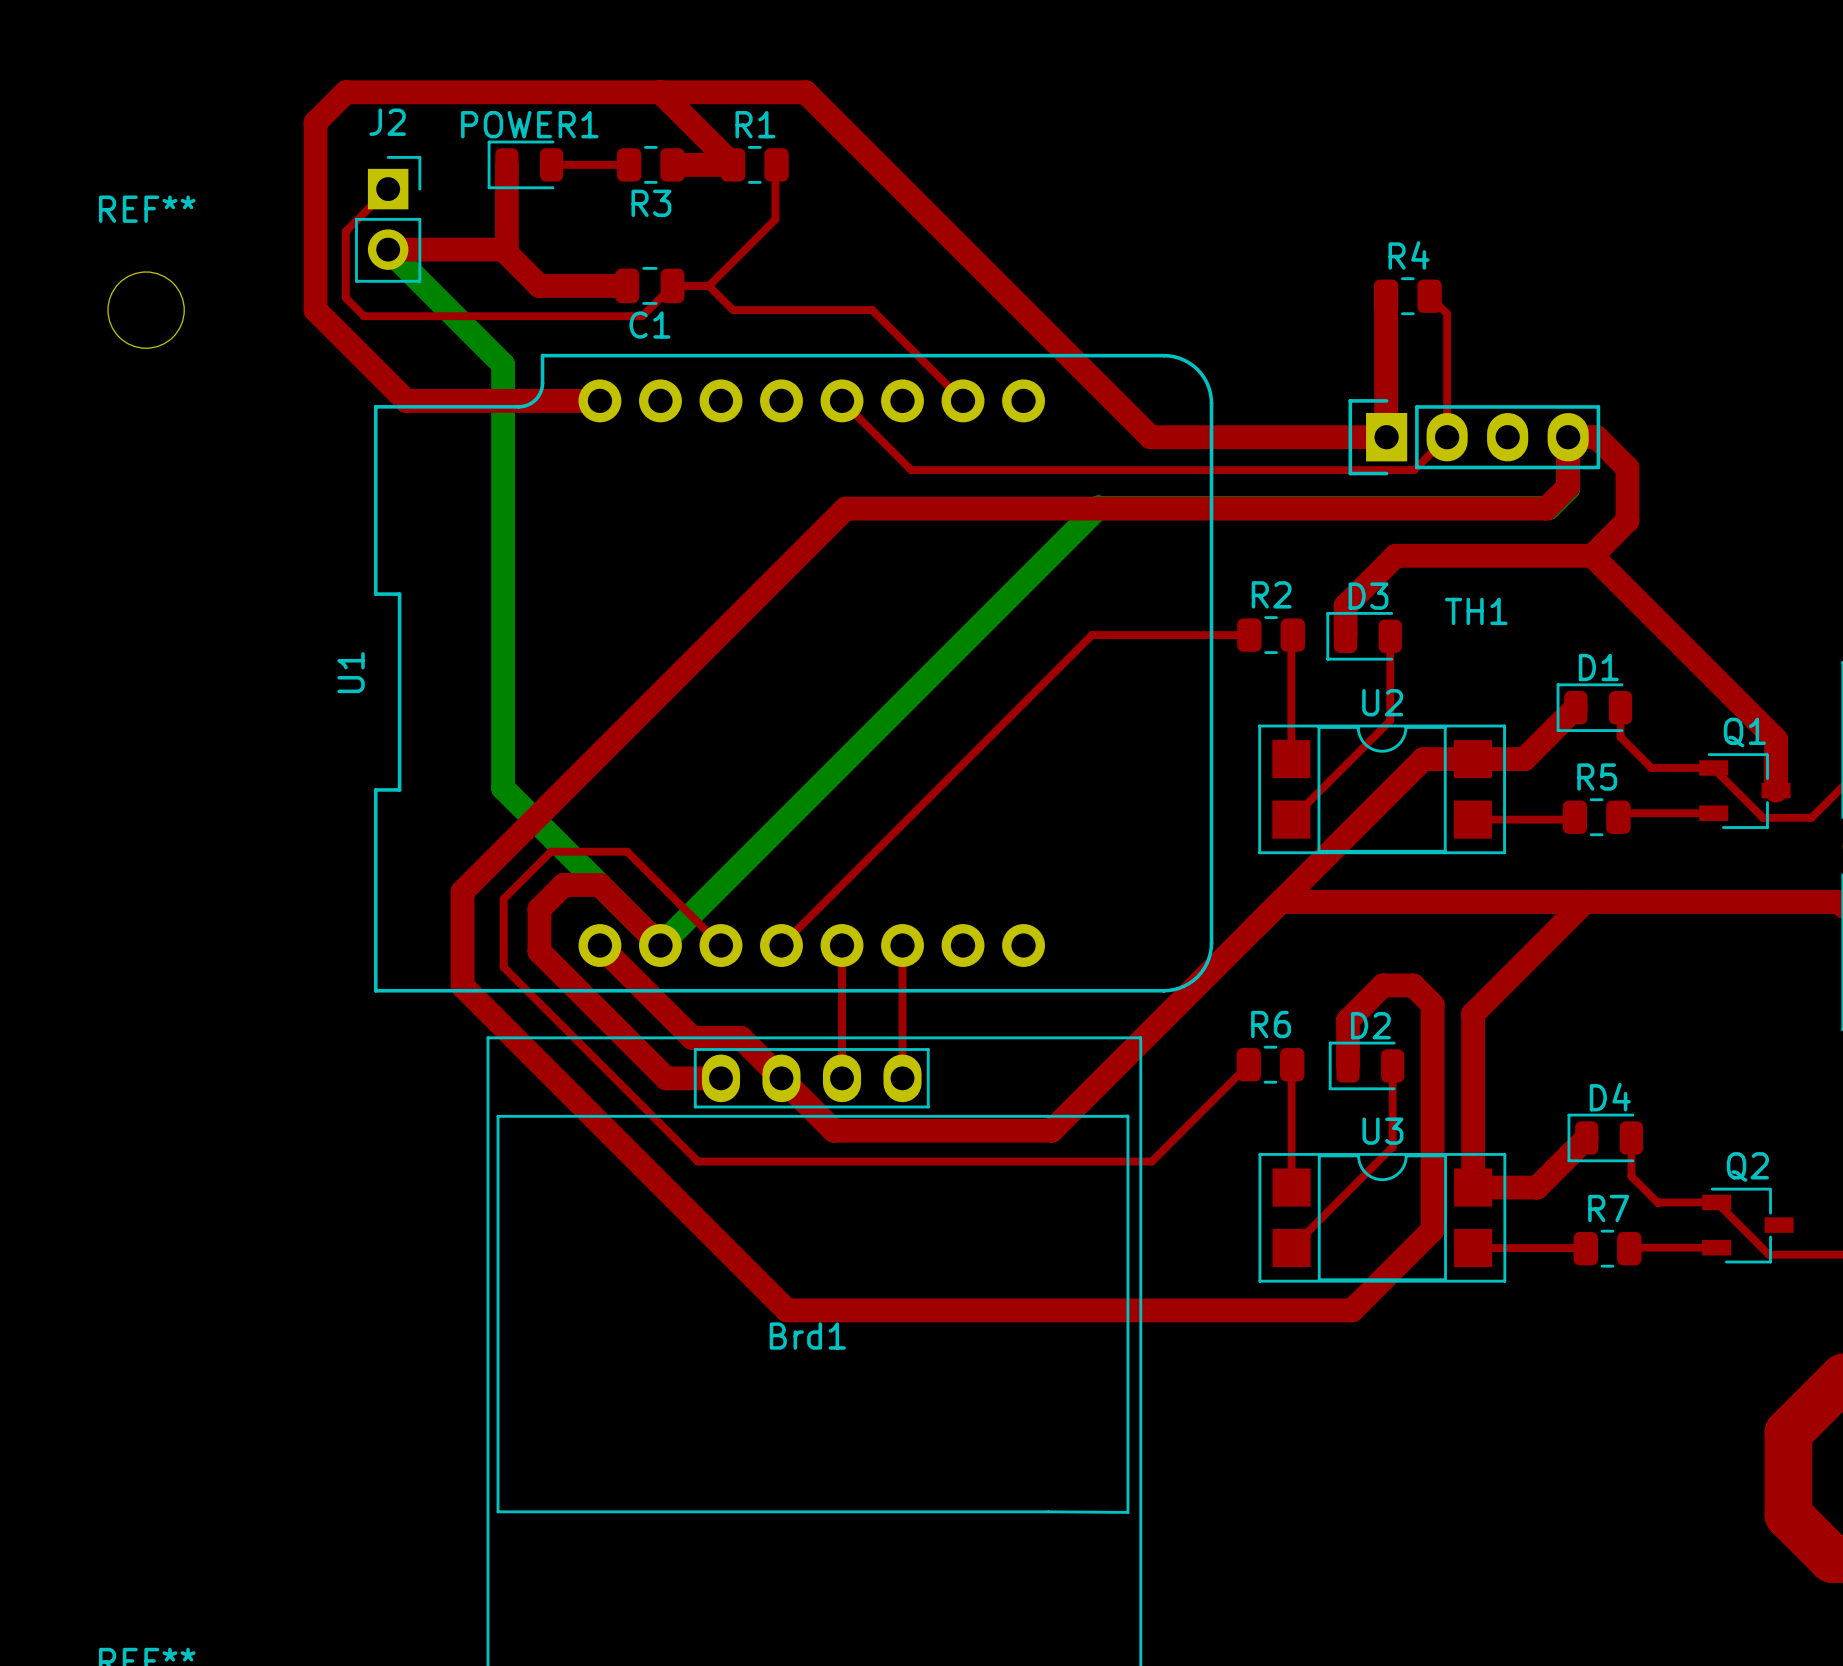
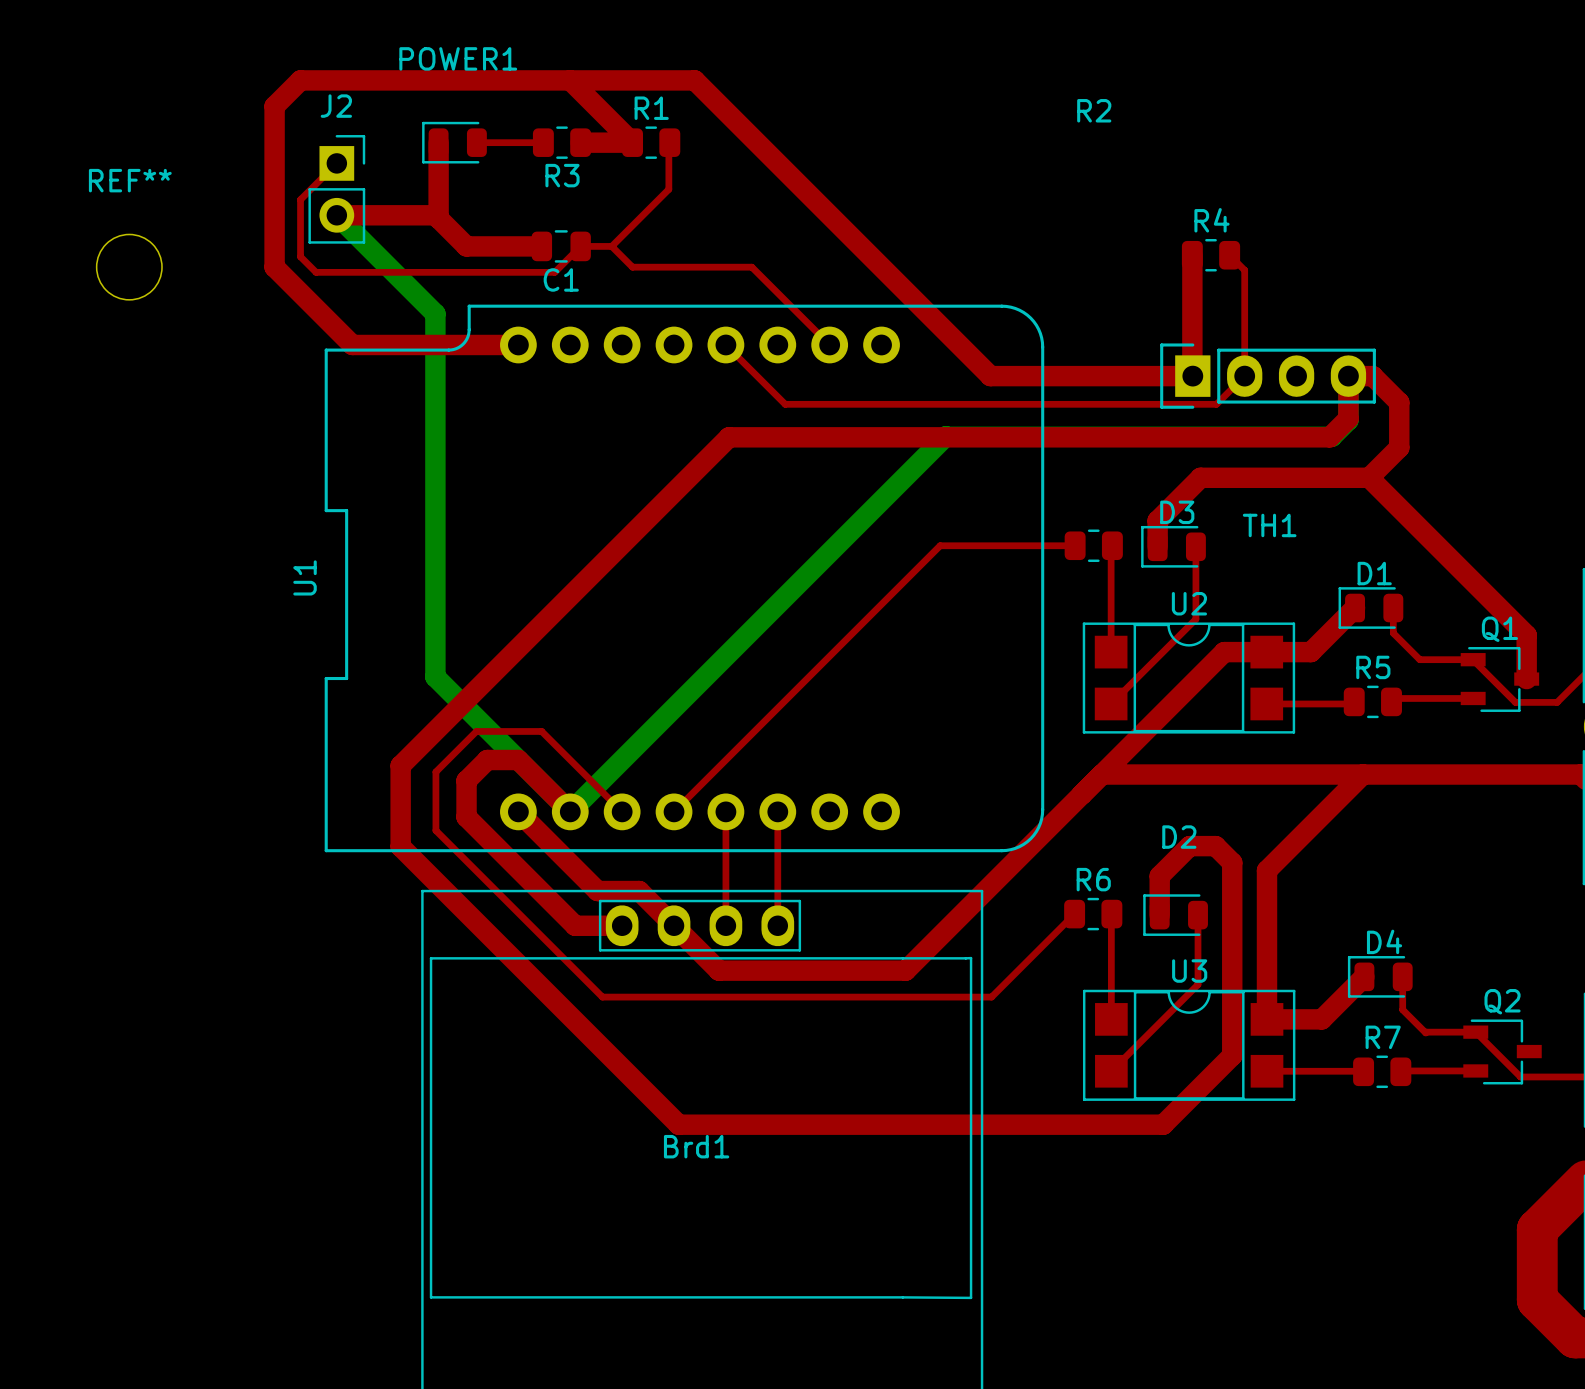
POWER1 name position: POWER1 (529, 124) -> POWER1 (458, 58)
R2 name position: R2 (1271, 594) -> R2 (1094, 110)
D2 name position: D2 (1370, 1025) -> D2 (1179, 837)

